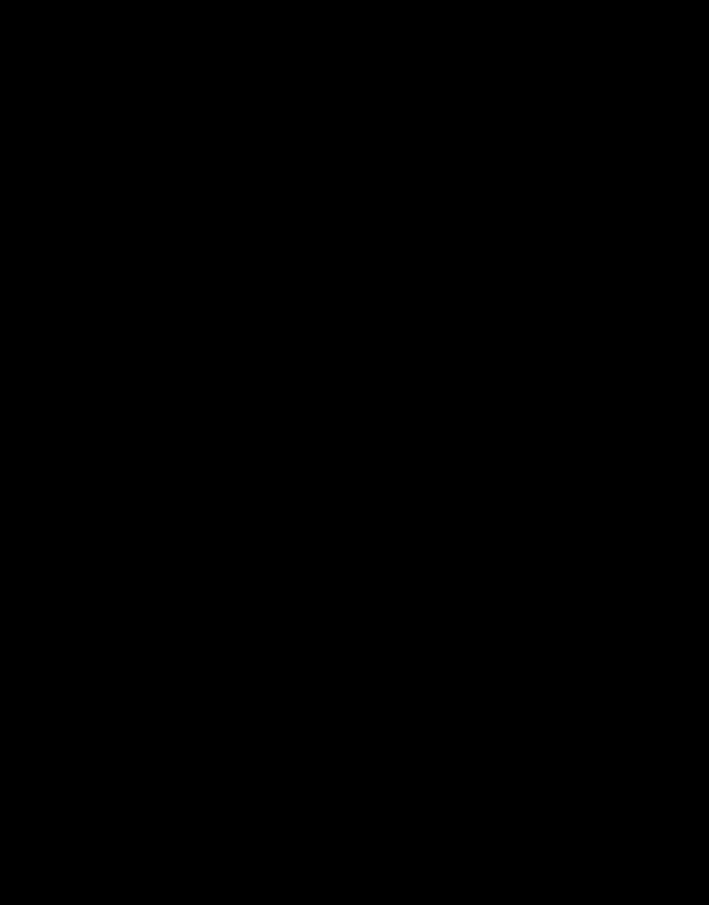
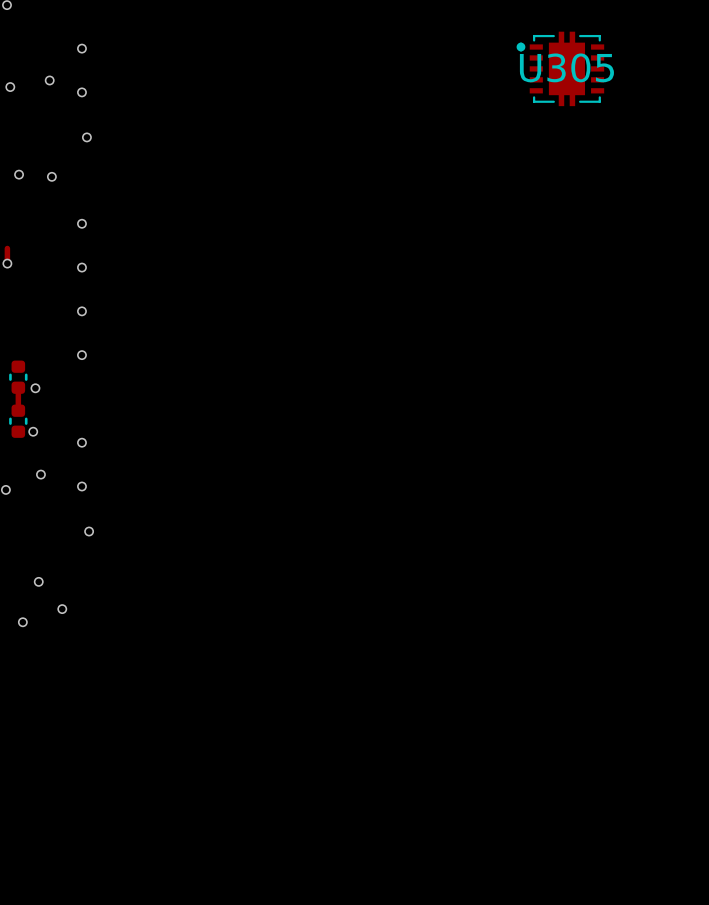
via: none -> (6, 5)
via: none -> (81, 48)
U305: none -> (560, 68)
via: none -> (49, 80)
via: none -> (10, 87)
via: none -> (81, 92)
via: none -> (86, 137)
via: none -> (19, 174)
via: none -> (51, 176)
via: none -> (81, 223)
top track: none -> (7, 248) (7, 263)
via: none -> (7, 263)
via: none -> (81, 267)
via: none -> (81, 311)
via: none -> (81, 355)
part: none -> (18, 377)
top track: none -> (18, 387) (18, 410)
via: none -> (35, 388)
part: none -> (18, 421)
via: none -> (33, 431)
via: none -> (81, 442)
via: none -> (40, 474)
via: none -> (81, 486)
via: none -> (5, 489)
via: none -> (89, 531)
via: none -> (38, 581)
via: none -> (62, 609)
via: none -> (22, 622)

